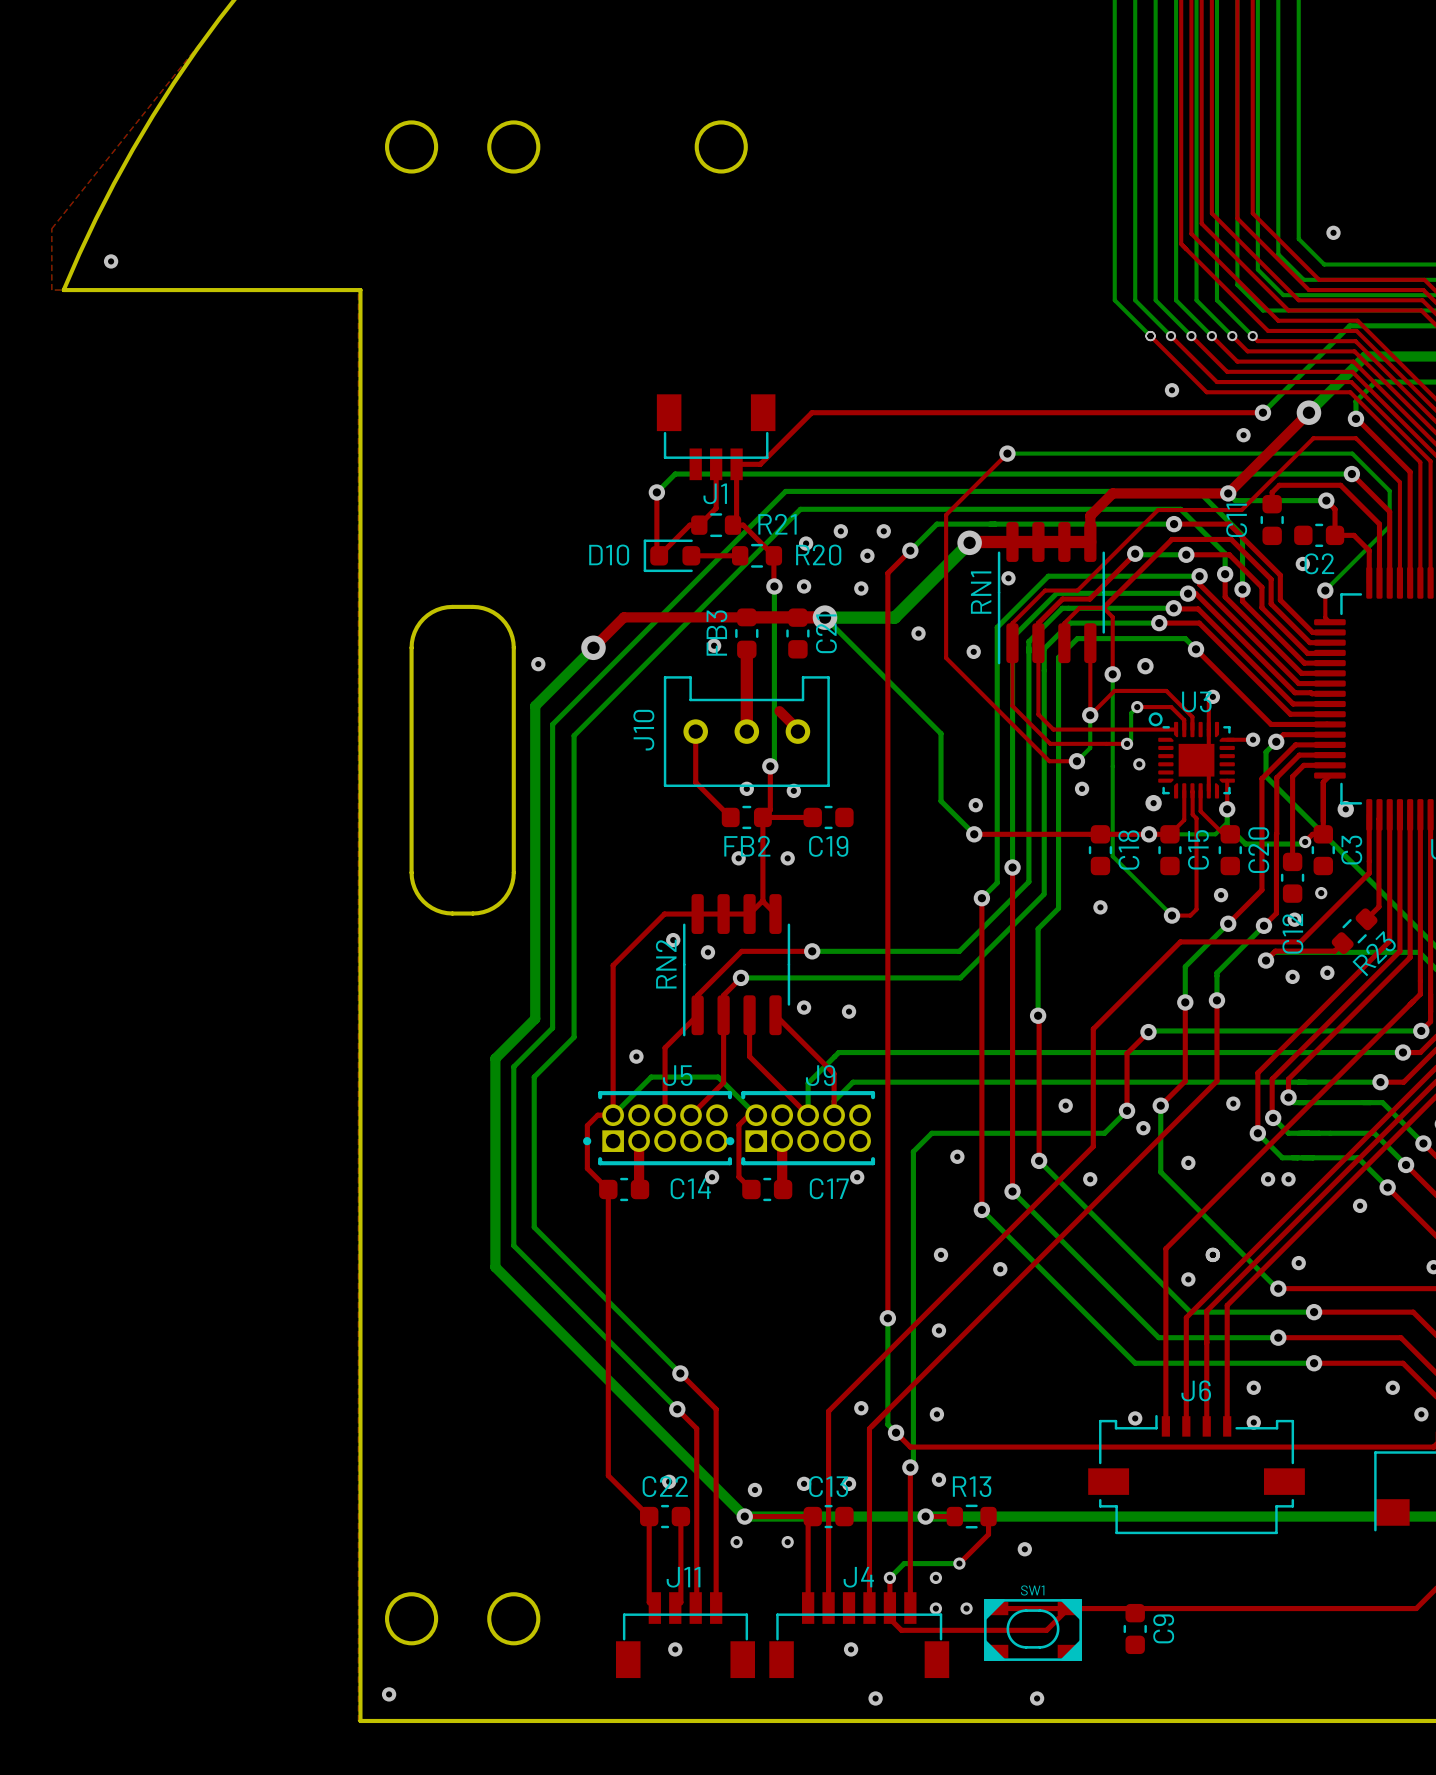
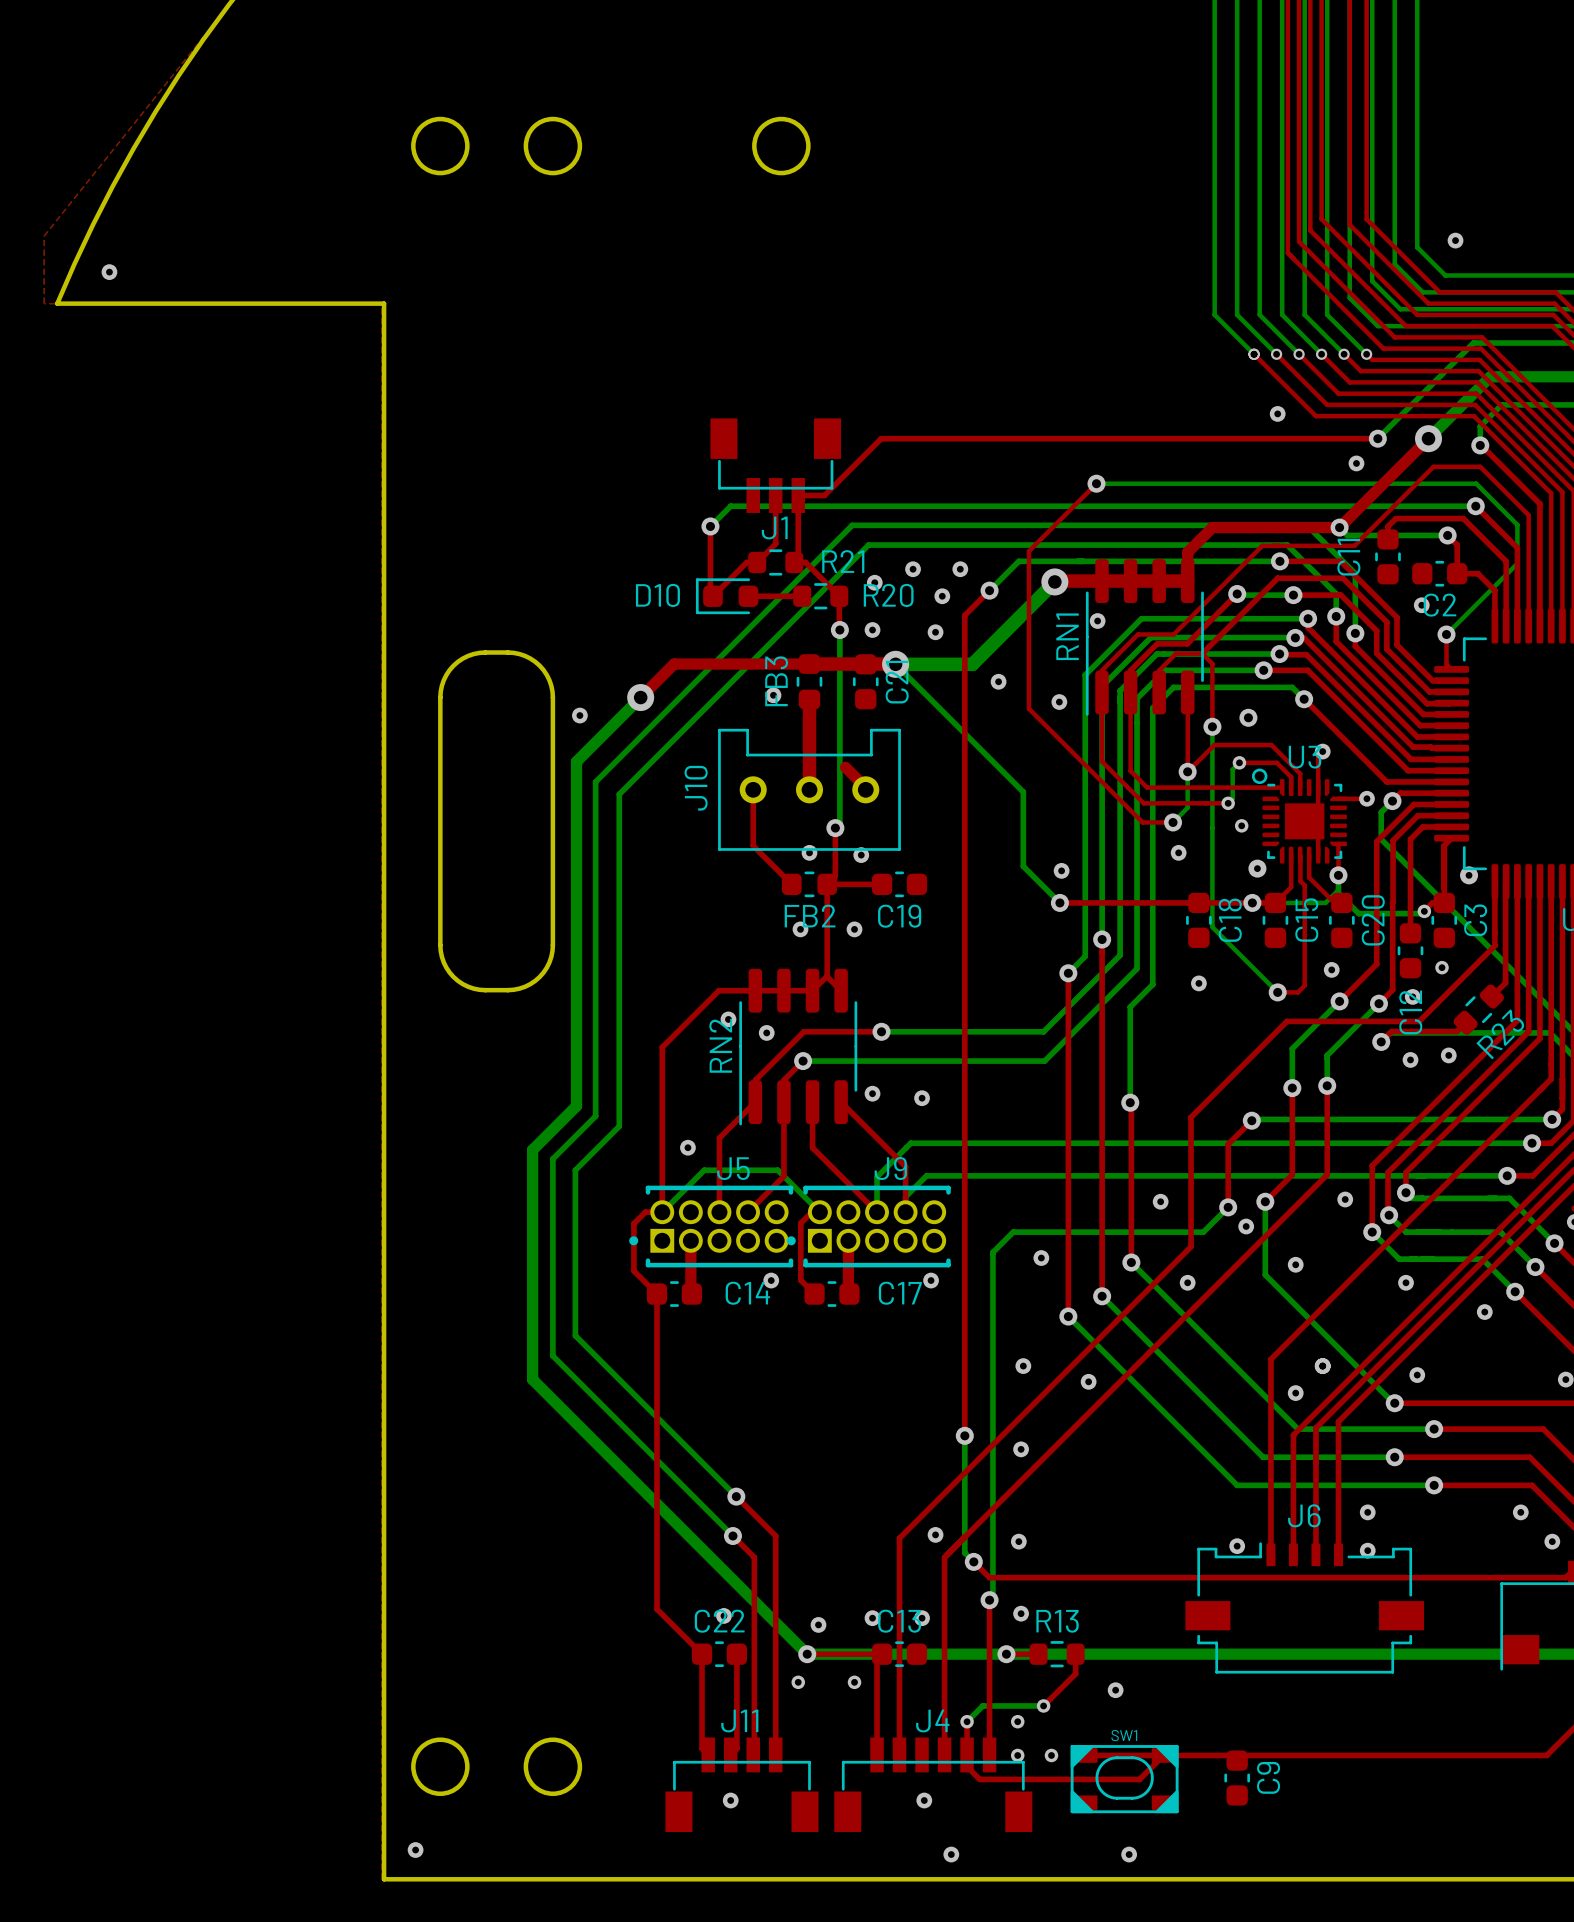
via: (1268, 1179) -> none

